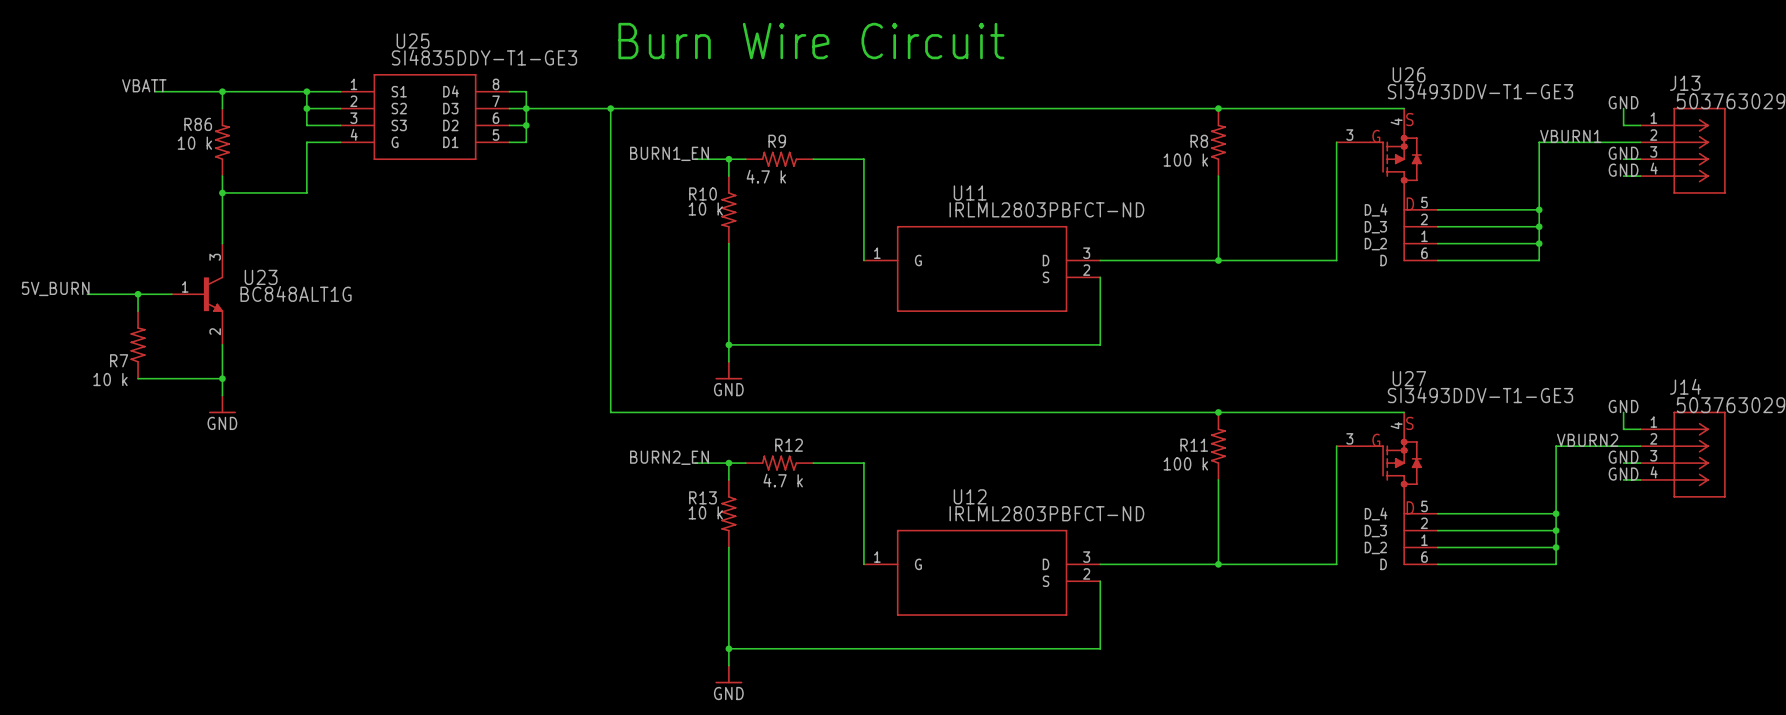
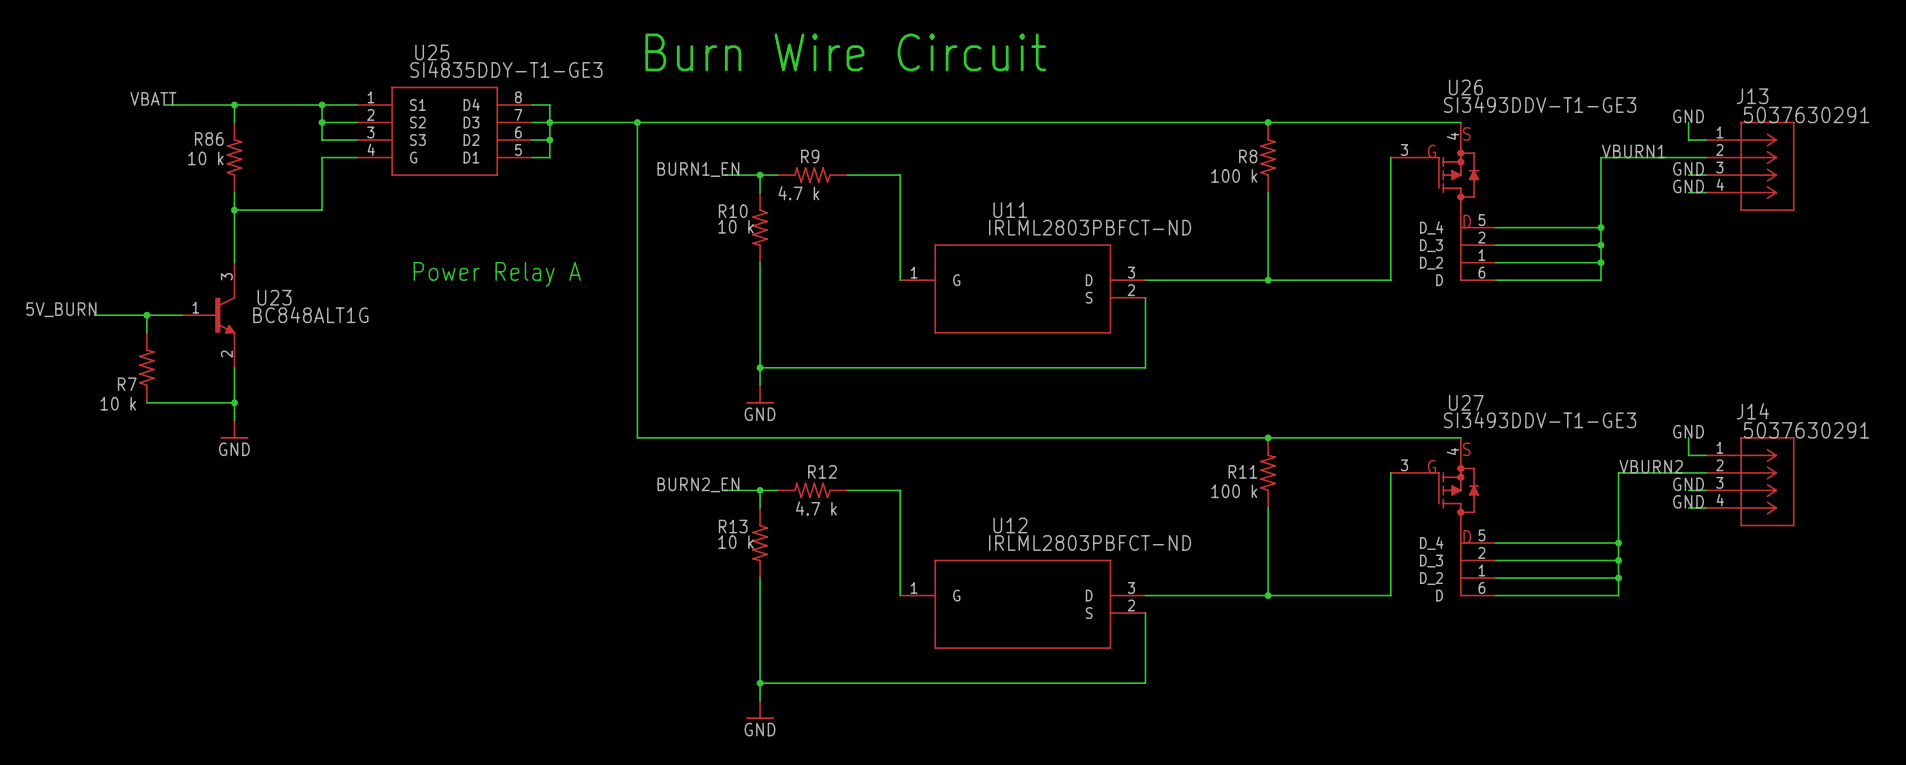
text: none -> Power Relay A (497, 274)

